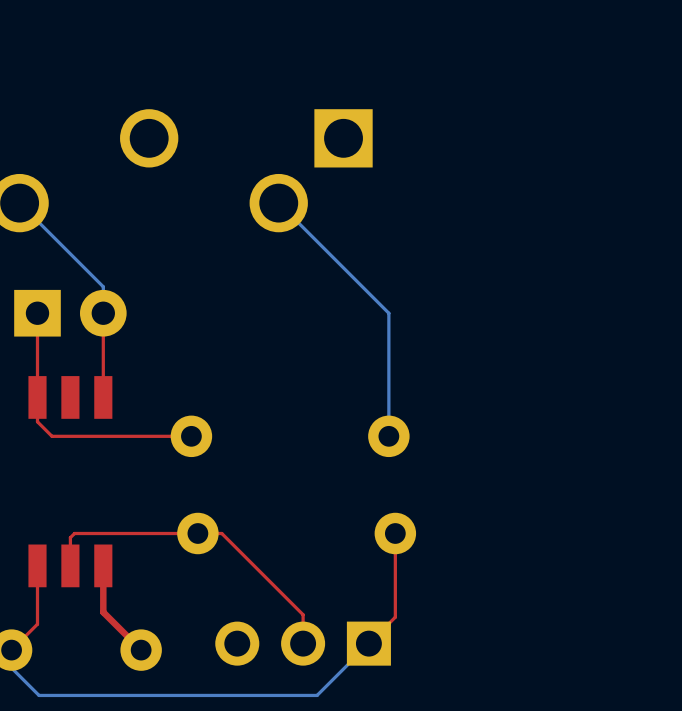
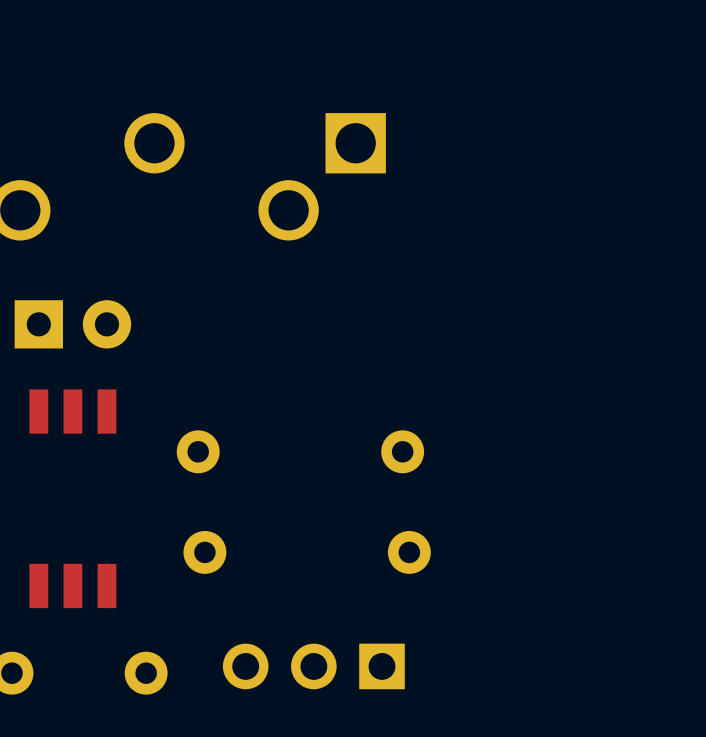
bottom track: (19, 203) (103, 286) (103, 313) -> none
bottom track: (278, 203) (388, 313) (388, 436) -> none
top track: (37, 313) (37, 421) (52, 436) (191, 436) -> none
top track: (103, 313) (103, 397) -> none
top track: (395, 533) (395, 617) (368, 643) -> none
top track: (37, 565) (37, 624) (11, 650) -> none
top track: (70, 565) (70, 537) (74, 533) (221, 533) (303, 614) (303, 643) -> none
top track: (103, 565) (103, 612) (141, 650) -> none
bottom track: (368, 643) (317, 695) (39, 695) (11, 667) (11, 650) -> none

